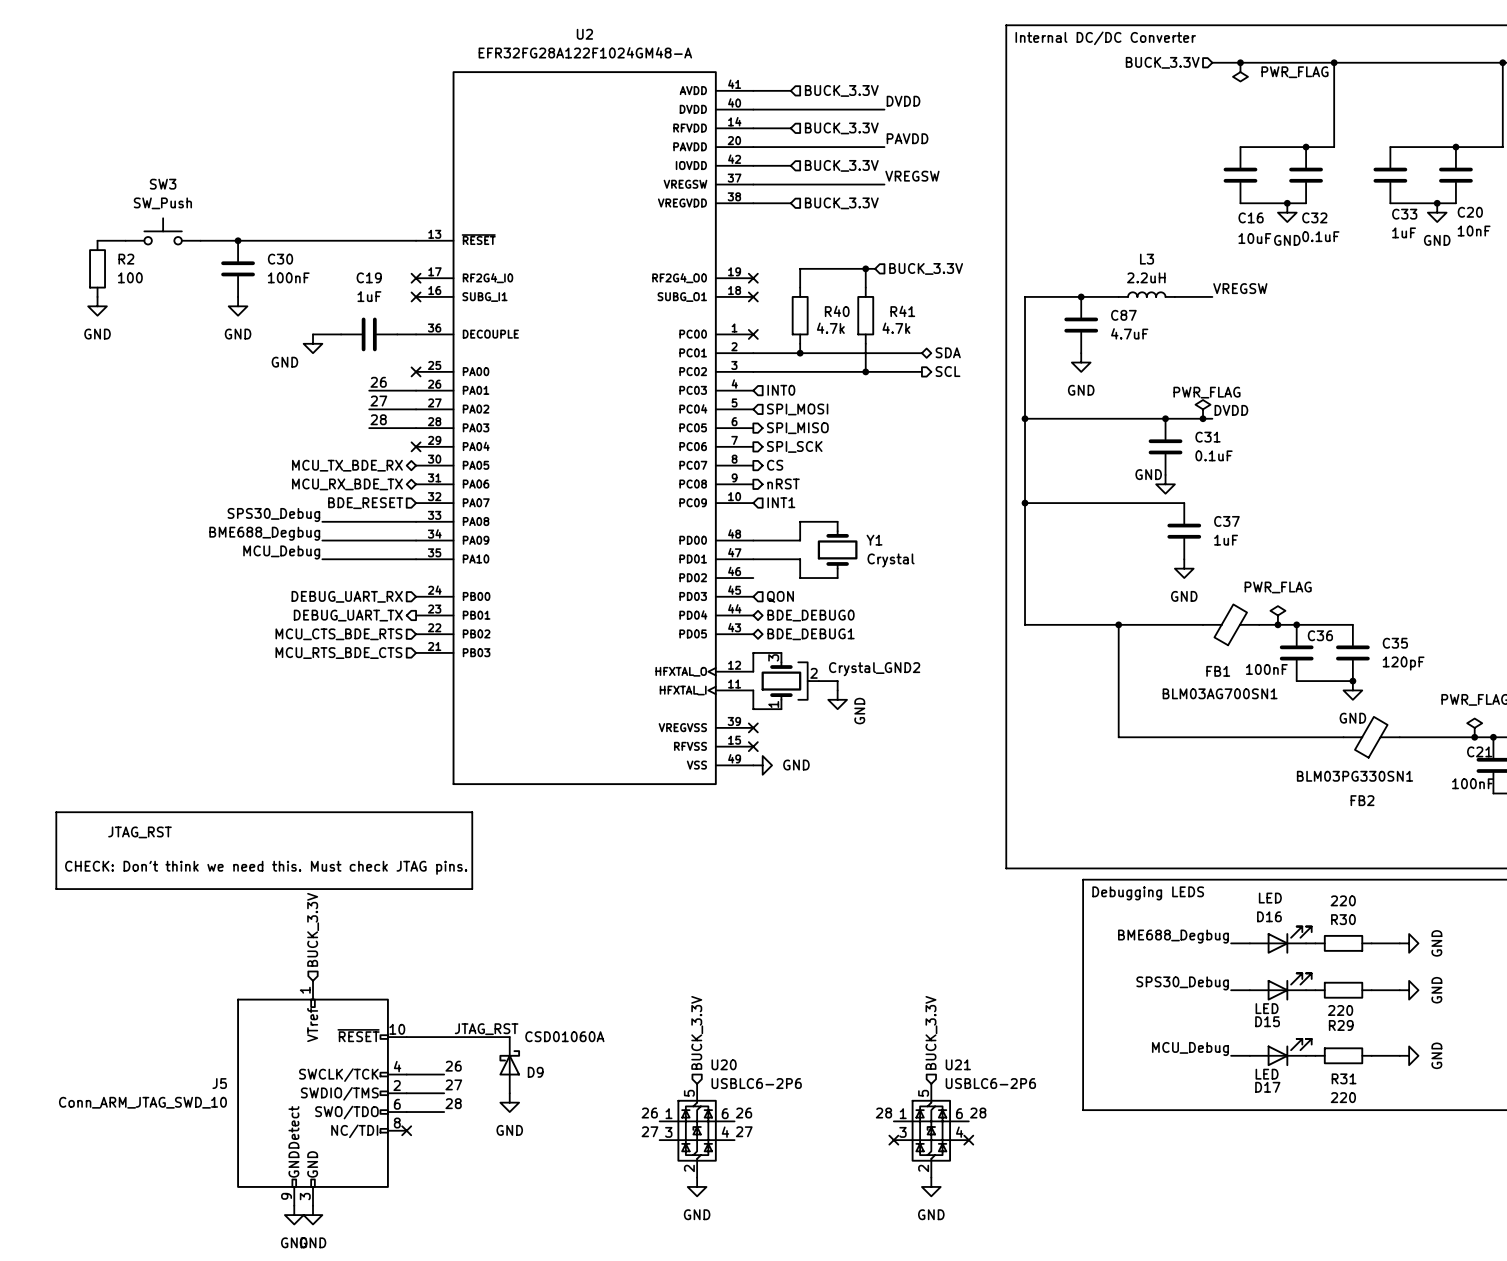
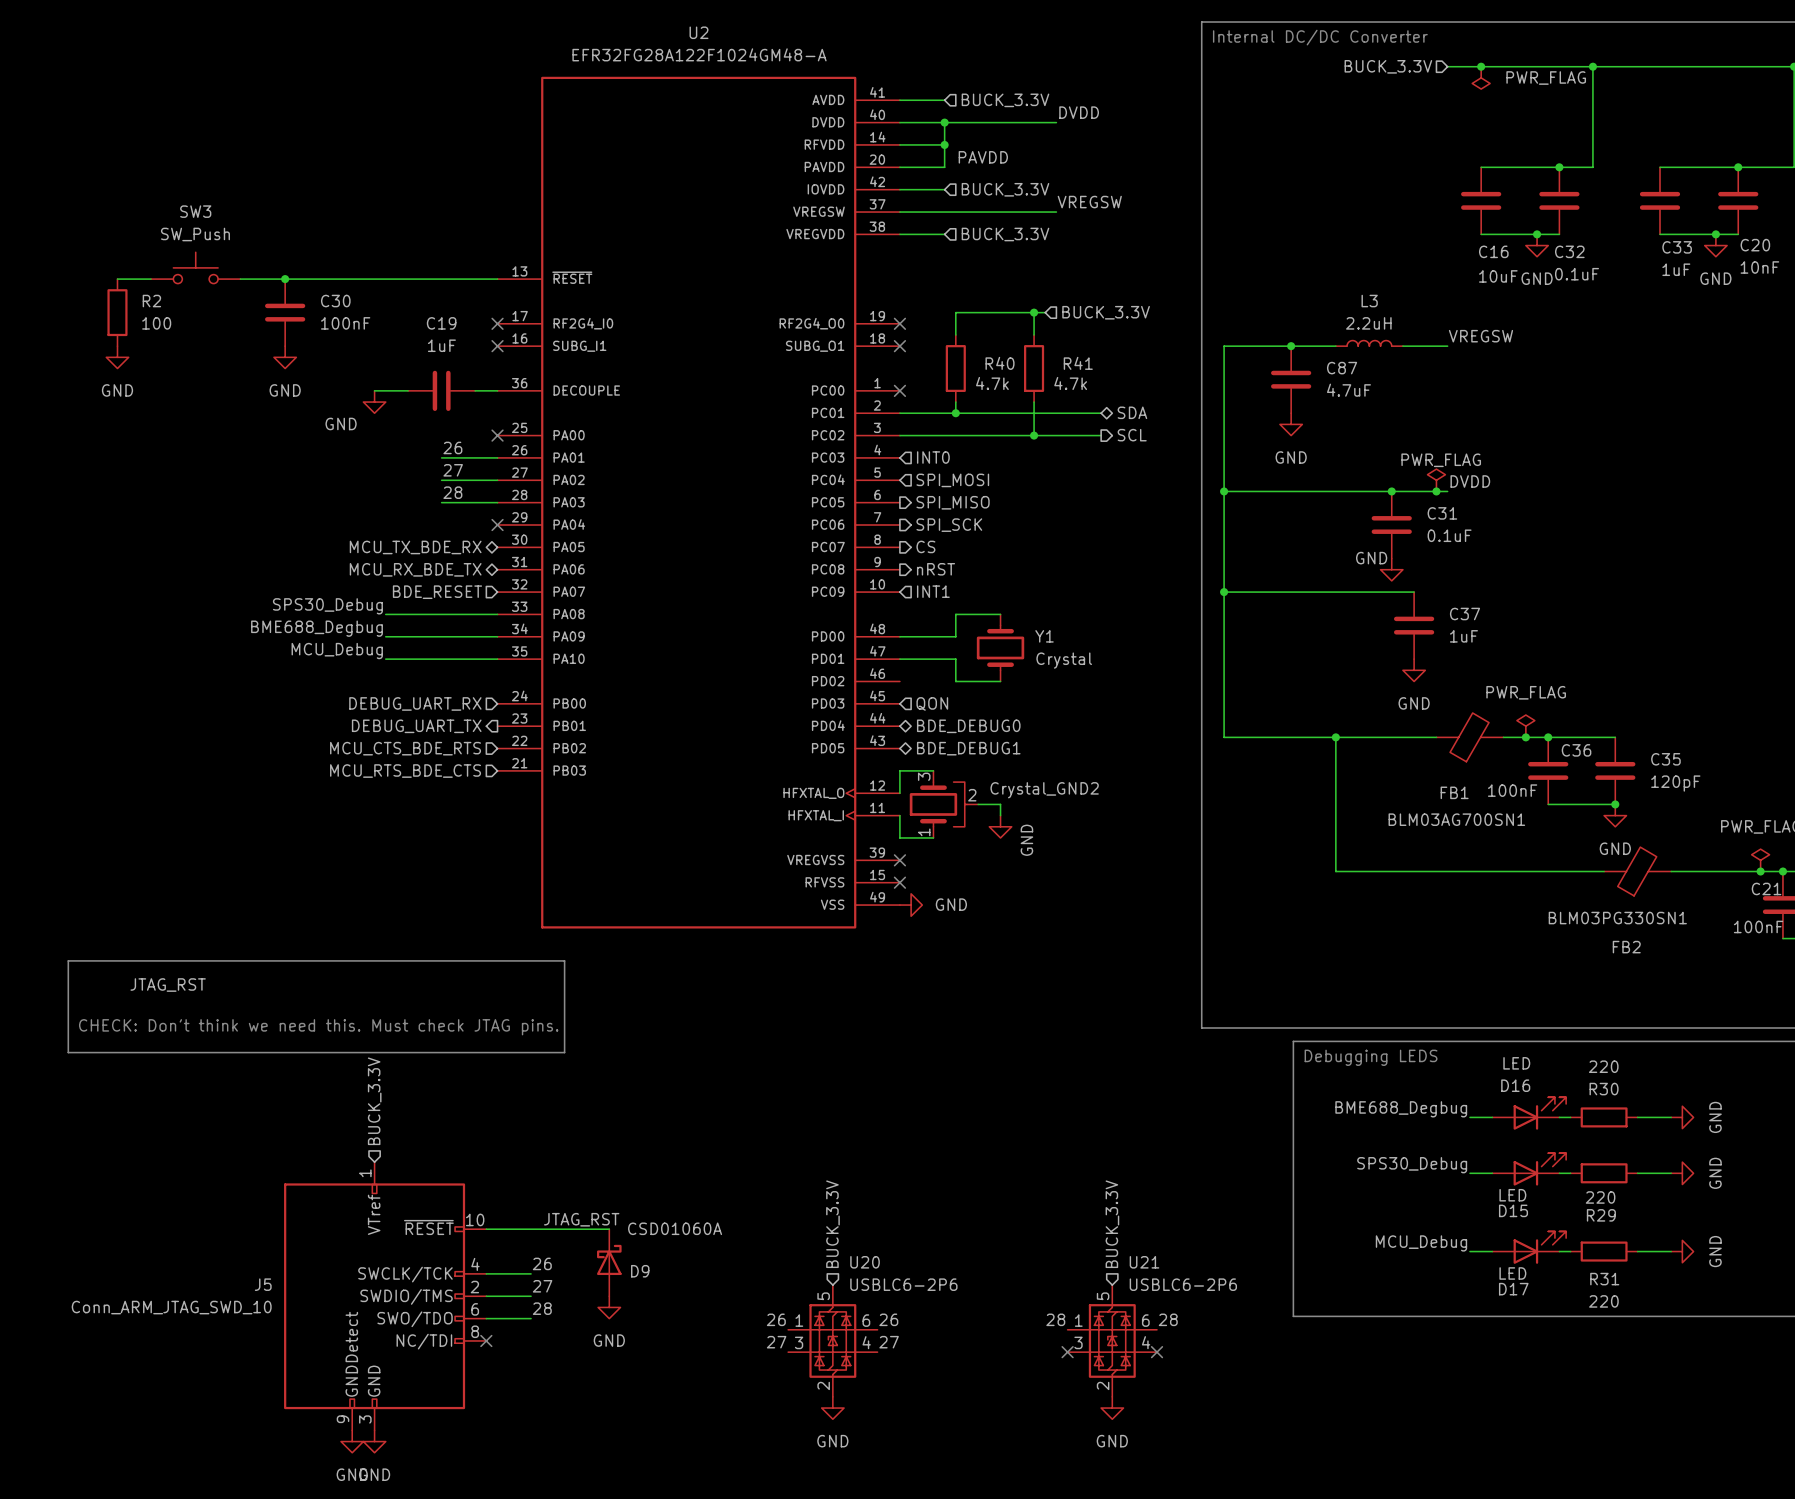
junction: none -> (944, 122)
junction: none -> (944, 144)
hierarchical label: BUCK_3.3V (841, 128) -> none
label position: PAVDD (907, 138) -> PAVDD (983, 157)
wire: (790, 147) (884, 147) -> (944, 167) (944, 122)

